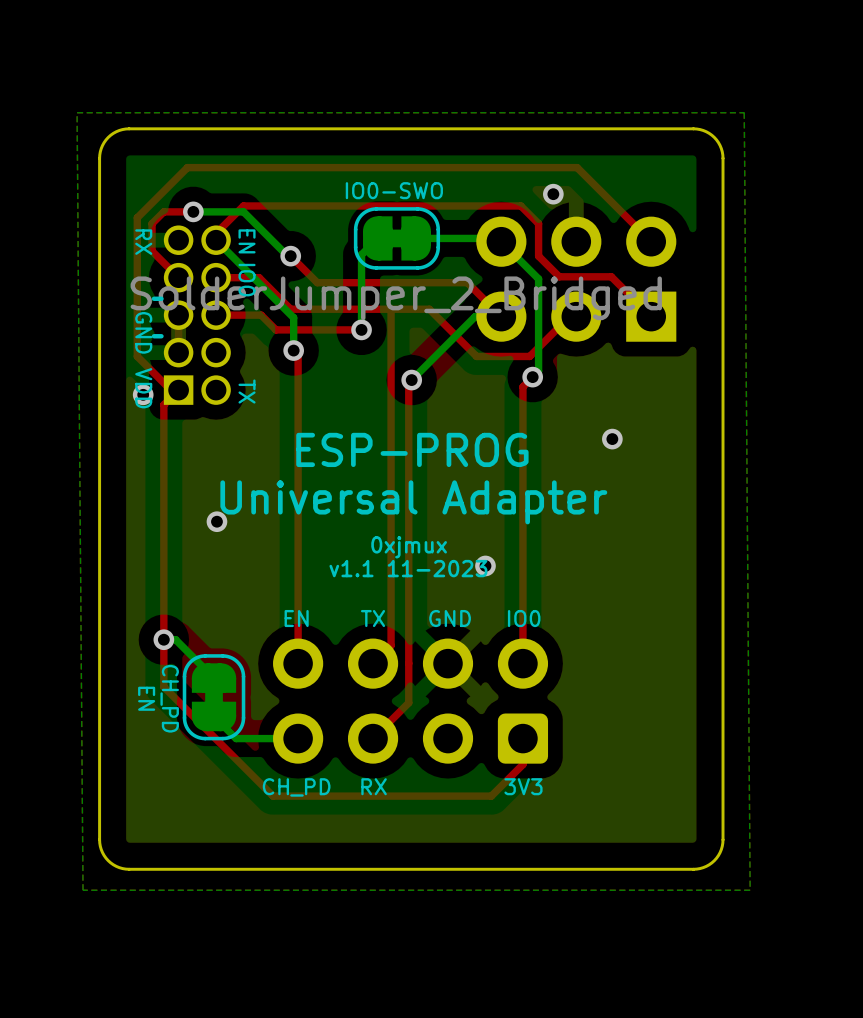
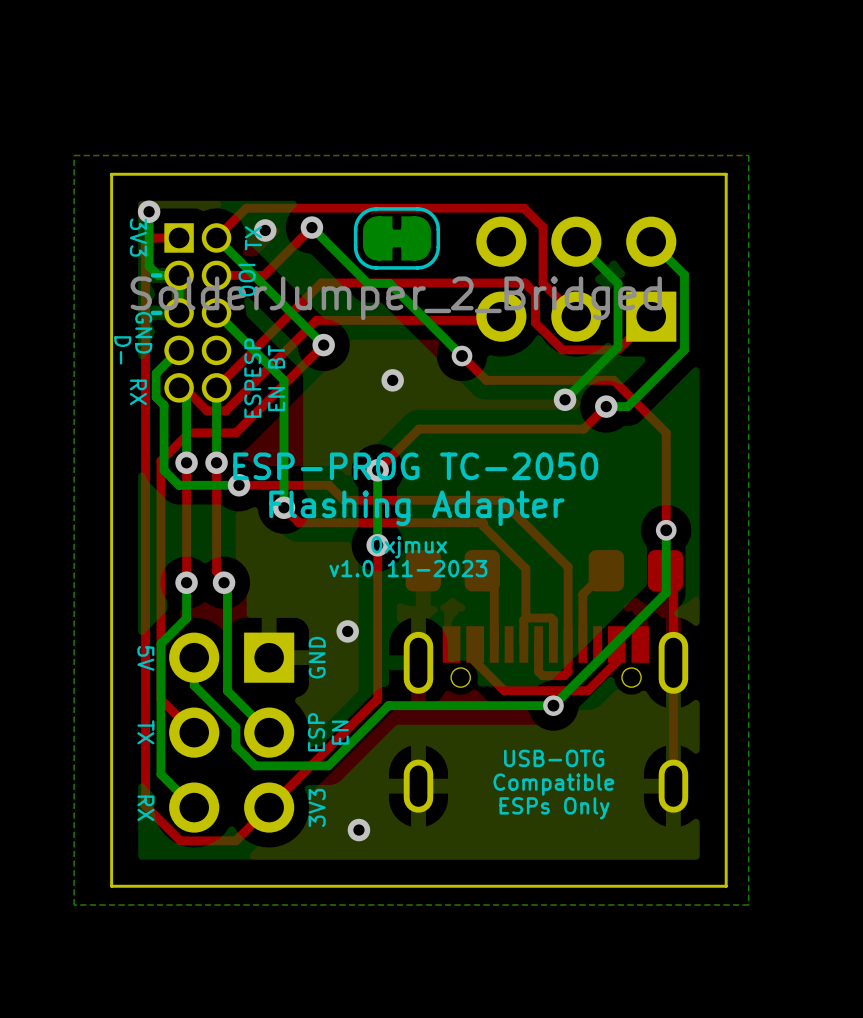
bottom zone outline: (744, 112) (750, 890) (83, 890) (77, 112) (744, 112) -> (748, 155) (748, 905) (74, 905) (74, 155) (748, 155)
board edge: (693, 128) (129, 128) (116, 131) (106, 139) (101, 148) (99, 158) (99, 839) (102, 852) (110, 862) (119, 867) (129, 869) (693, 869) (706, 866) (716, 858) (721, 849) (723, 839) (723, 158) (720, 145) (714, 137) (706, 131) (693, 128) -> (726, 174) (726, 886) (111, 886) (111, 174) (726, 174)
text: IO0-SWO (394, 190) -> none
via: (553, 194) -> none
bottom track: none -> (149, 211) (149, 266) (158, 275) (179, 275) (179, 312)
via: none -> (149, 211)
top track: (193, 211) (163, 211) (152, 223) (152, 251) (178, 277) -> none
bottom track: (193, 211) (243, 211) (287, 256) (290, 256) -> none
via: (193, 211) -> none
part footprint: [163, 225, 231, 405] -> [164, 223, 232, 403]
top track: none -> (311, 227) (264, 275) (216, 275)
bottom track: none -> (311, 227) (367, 283) (389, 283) (462, 356)
via: none -> (311, 227)
via: none -> (265, 230)
text: none -> 3V3 (138, 237)
top track: none -> (179, 237) (153, 237) (145, 245) (145, 805) (180, 840) (235, 840) (377, 699) (377, 545)
bottom track: none -> (216, 237) (323, 345)
bottom track: (377, 238) (361, 254) (361, 329) -> none
bottom track: (416, 238) (498, 238) (538, 278) (538, 371) (532, 377) -> none
top track: (216, 240) (216, 233) (243, 205) (520, 205) (538, 223) (538, 256) (559, 276) (611, 276) (651, 316) -> (216, 387) (321, 282) (524, 282) (535, 293) (535, 322) (562, 349) (617, 349) (651, 316)
bottom track: (216, 240) (293, 317) (293, 350) -> none
text: EN (247, 241) -> none
bottom track: none -> (576, 241) (617, 283) (617, 346) (565, 399)
top track: (651, 241) (577, 167) (187, 167) (137, 217) (137, 356) (170, 390) (178, 390) (163, 404) (163, 686) (273, 796) (491, 796) (522, 764) (522, 738) -> none
bottom track: none -> (651, 241) (684, 274) (684, 349) (627, 406) (606, 406)
text position: RX (143, 242) -> RX (138, 392)
top track: (290, 256) (317, 282) (467, 282) (501, 316) -> none
via: (290, 256) -> none
top track: (216, 277) (259, 277) (290, 309) (429, 309) (476, 356) (529, 356) (569, 316) (576, 316) -> (224, 230) (246, 208) (524, 208) (543, 227) (543, 283) (576, 316)
line: (161, 298) (154, 298) -> (160, 275) (152, 275)
top track: (391, 309) (391, 645) (373, 663) -> none
bottom track: none -> (216, 312) (284, 380) (284, 507)
top track: (216, 315) (261, 315) (275, 329) (361, 329) -> none
bottom track: (501, 316) (475, 316) (411, 380) -> none
top track: none -> (497, 320) (316, 320) (226, 410) (207, 410) (186, 390) (186, 380)
via: (361, 329) -> none
line: (161, 336) (154, 336) -> (160, 312) (152, 312)
top track: none -> (323, 345) (235, 432) (189, 432) (160, 460) (160, 699) (194, 732)
via: none -> (323, 345)
text: none -> D- (122, 350)
bottom track: none -> (179, 350) (156, 373) (156, 397) (164, 405) (164, 470) (179, 485) (239, 485)
top track: (293, 350) (298, 354) (298, 663) -> none
via: (293, 350) -> none
text: none -> BT (276, 356)
top track: none -> (462, 356) (486, 380) (613, 380) (666, 432) (666, 530)
via: none -> (462, 356)
text: none -> ESP (252, 357)
top track: (532, 377) (522, 386) (522, 663) -> none
via: (532, 377) -> none
top track: (411, 380) (408, 383) (408, 702) (373, 738) -> none
via position: (411, 380) -> (392, 380)
bottom track: none -> (179, 387) (186, 395) (186, 462)
bottom track: none -> (216, 387) (216, 462)
text: VDD (143, 388) -> none
text rotation: 0° (247, 391) -> 180° (253, 238)
text position: TX (247, 391) -> TX (253, 238)
via: (143, 394) -> none
text: none -> ESP (252, 398)
text: none -> EN (276, 399)
via: none -> (565, 399)
top track: none -> (606, 406) (583, 429) (418, 429) (377, 470)
via: none -> (606, 406)
via: (612, 439) -> none
text: ESP-PROG (412, 449) -> ESP-PROG TC-2050 (415, 466)
top track: none -> (186, 462) (186, 582)
via: none -> (186, 462)
top track: none -> (216, 462) (216, 571) (224, 579) (224, 582) (227, 582)
via: none -> (216, 462)
bottom track: none -> (377, 470) (377, 545)
via: none -> (377, 470)
top track: none -> (239, 485) (328, 485) (343, 500) (501, 500) (568, 567) (568, 671) (564, 675) (542, 675) (538, 671) (538, 644)
via: none -> (239, 485)
text: Universal Adapter (413, 502) -> Flashing Adapter (416, 508)
top track: none -> (284, 507) (298, 522) (483, 522) (483, 526) (525, 568) (525, 618)
via: none -> (284, 507)
via: (216, 521) -> none
bottom track: none -> (666, 530) (666, 592) (553, 705) (388, 705) (328, 765) (255, 765) (235, 746) (235, 727) (194, 685) (194, 657)
via: none -> (666, 530)
via: none -> (377, 545)
via: (485, 565) -> none
text: v1.1 11-2023 (408, 568) -> v1.0 11-2023 (408, 568)
part: none -> (452, 570)
top track: none -> (482, 570) (494, 582) (494, 644)
top track: none -> (606, 570) (582, 594) (582, 644)
part: none -> (635, 570)
top track: none -> (665, 570) (673, 578) (673, 786)
bottom track: none -> (186, 582) (186, 618) (160, 643) (160, 774) (194, 807)
via: none -> (186, 582)
via: none -> (224, 582)
bottom track: none -> (227, 582) (227, 690) (269, 732)
text: EN (296, 618) -> none
text: TX (373, 618) -> none
text rotation: 0° (450, 618) -> 90° counterclockwise (317, 657)
text position: GND (450, 618) -> GND (317, 657)
text: IO0 (524, 618) -> none
via: none -> (347, 631)
bottom track: (163, 639) (175, 639) (214, 678) -> none
via: (163, 639) -> none
top track: none -> (553, 644) (553, 620) (551, 618) (525, 618) (523, 620) (523, 644)
top track: none -> (616, 644) (616, 661) (588, 690) (504, 690) (475, 661) (475, 644)
text: none -> 5V (145, 658)
part: (214, 697) -> none
text: EN (146, 698) -> none
text: CH_PD (169, 698) -> none
part: (410, 701) -> none
via: none -> (553, 705)
bottom track: (214, 716) (236, 738) (298, 738) -> none
part: none -> (545, 719)
text: none -> TX (145, 732)
part: none -> (231, 732)
text: none -> ESP (316, 732)
text: none -> EN (340, 732)
text: none -> USB-OTG (554, 758)
text: none -> Compatible (553, 784)
text rotation: 0° (374, 786) -> 90° clockwise (145, 808)
text position: RX (374, 786) -> RX (145, 808)
text rotation: 0° (523, 786) -> 90° counterclockwise (317, 807)
text position: 3V3 (523, 786) -> 3V3 (317, 807)
text: CH_PD (296, 787) -> none
text: none -> ESPs Only (554, 808)
via: none -> (358, 830)

